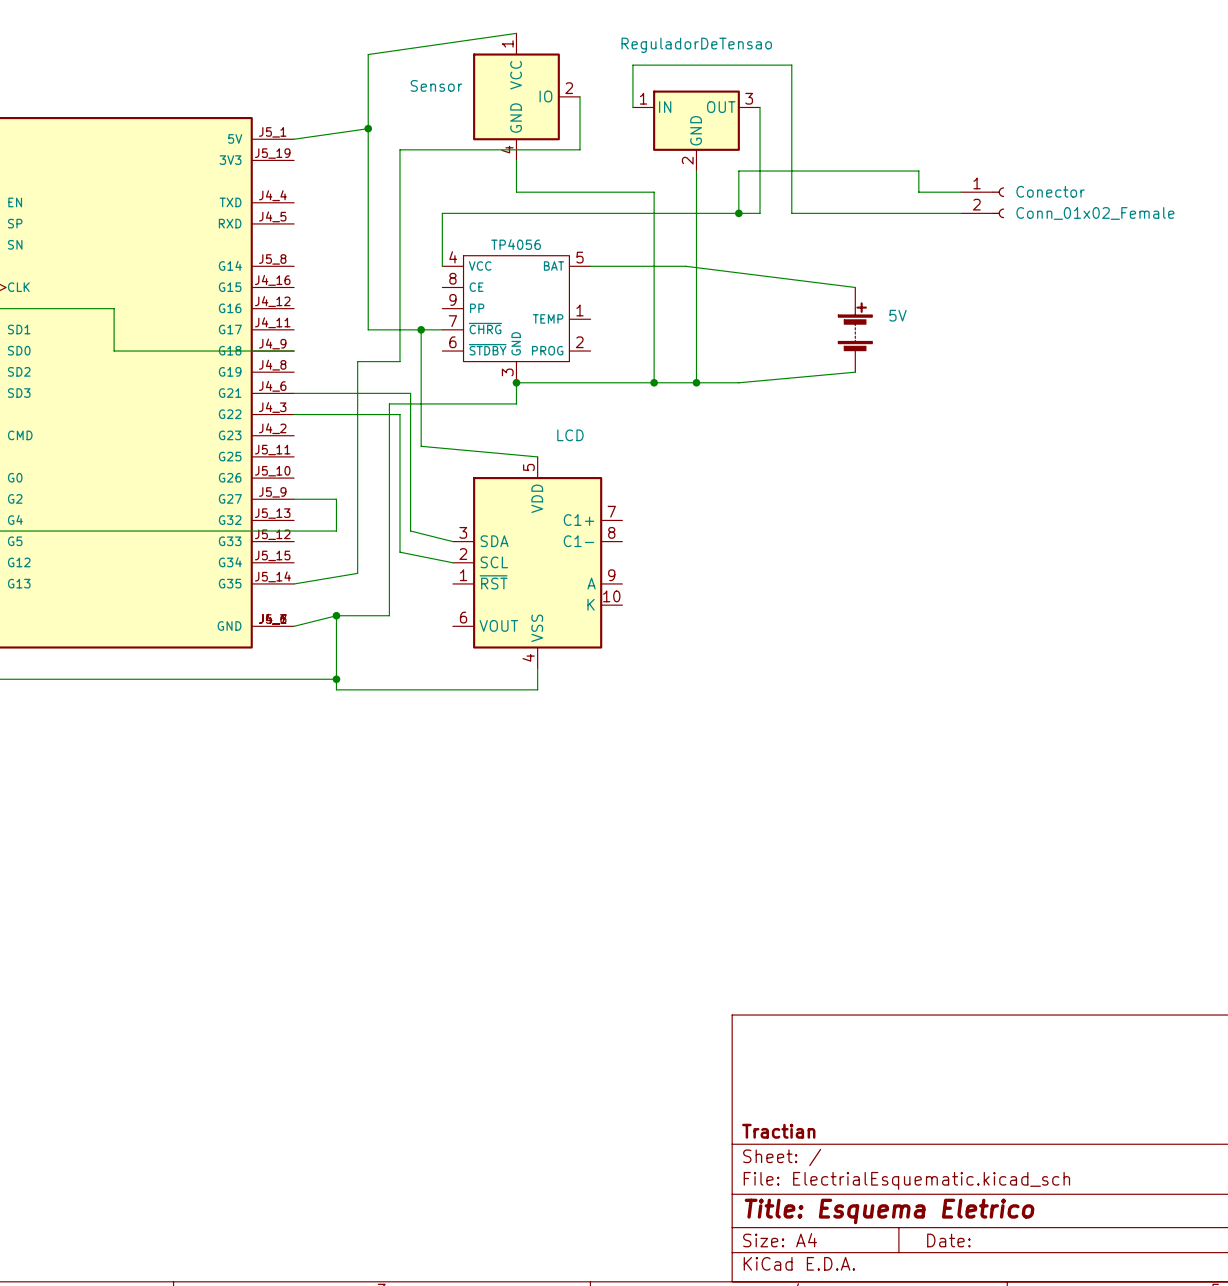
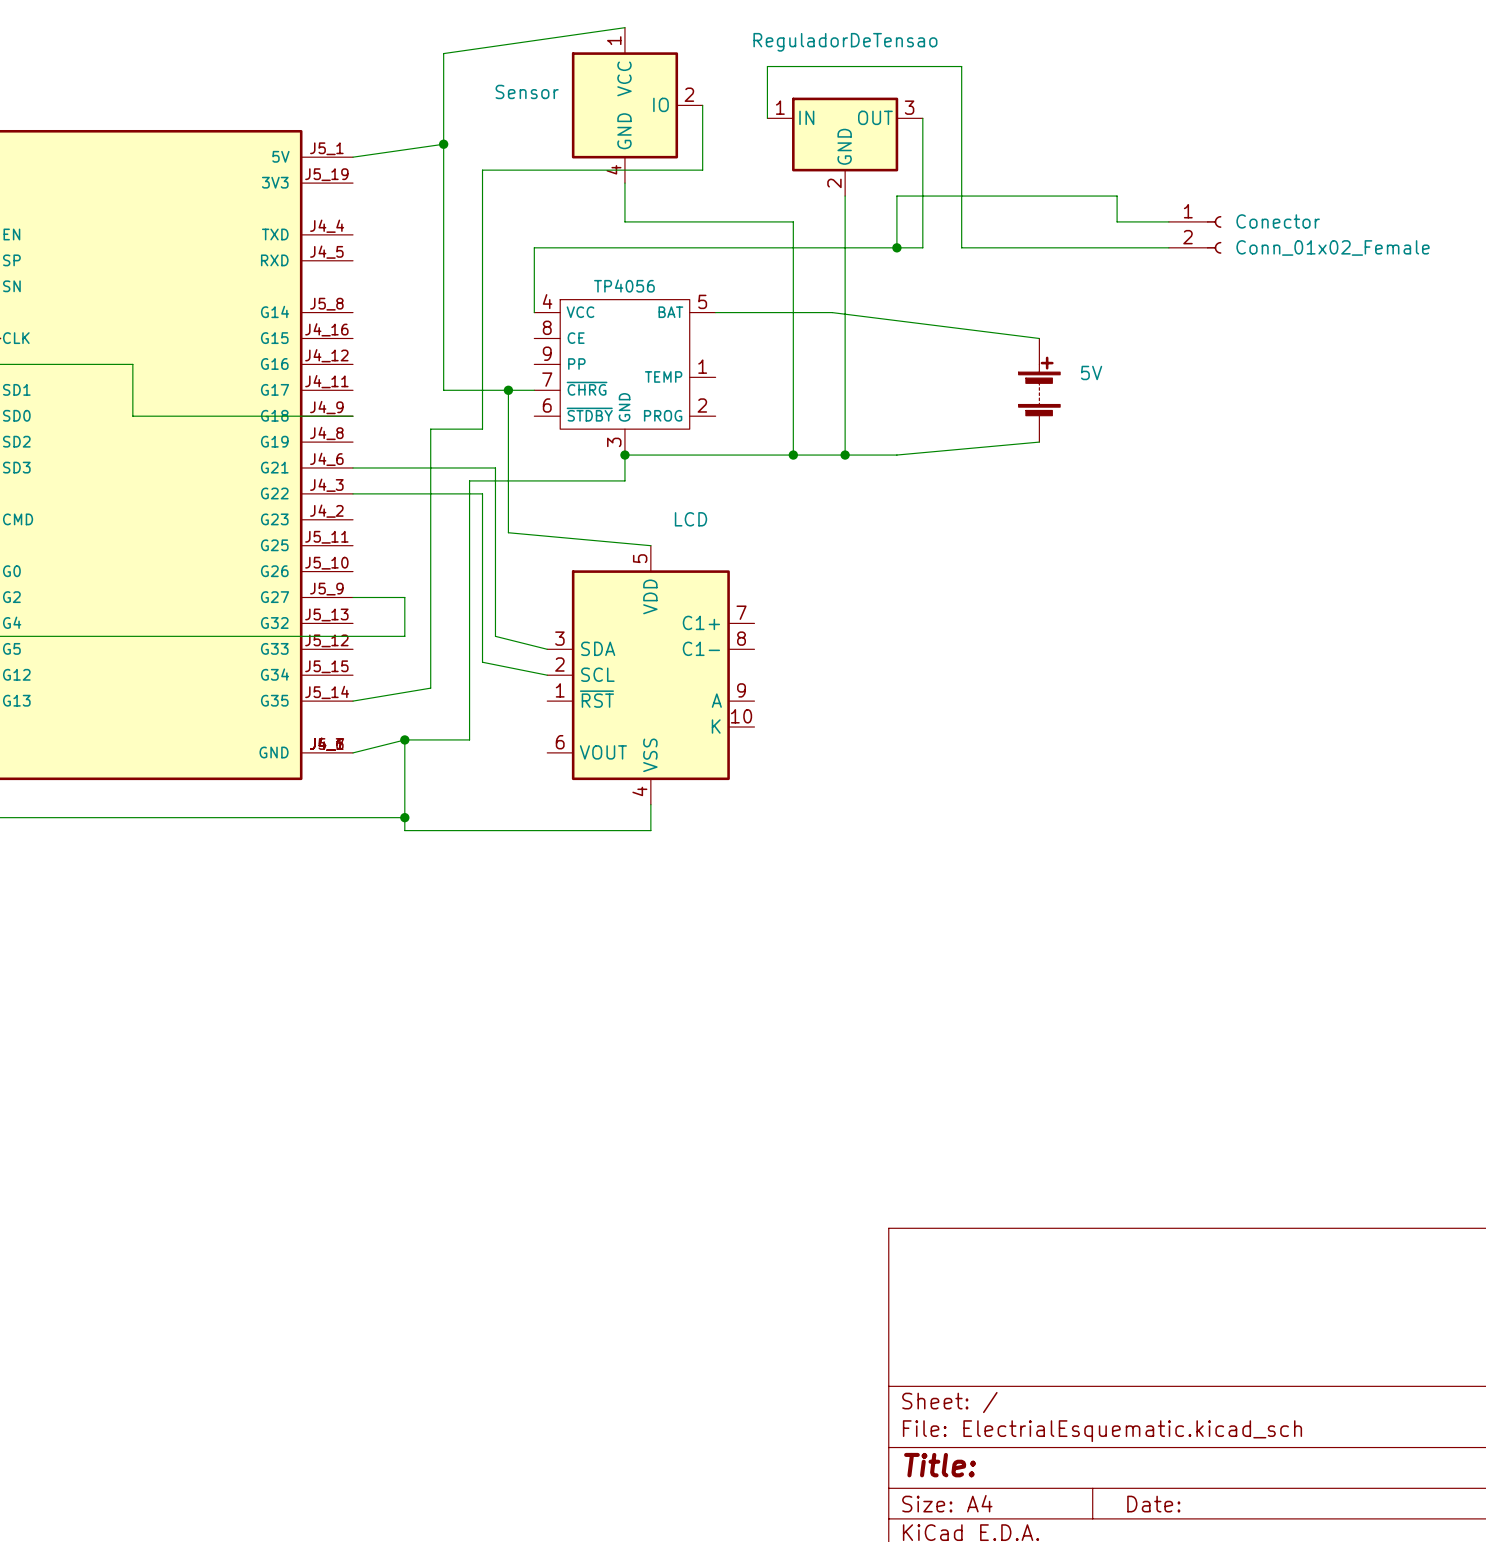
title block: Tractian (778, 1131) -> none
title block: Title: Esquema Eletrico (889, 1211) -> Title: (940, 1465)

